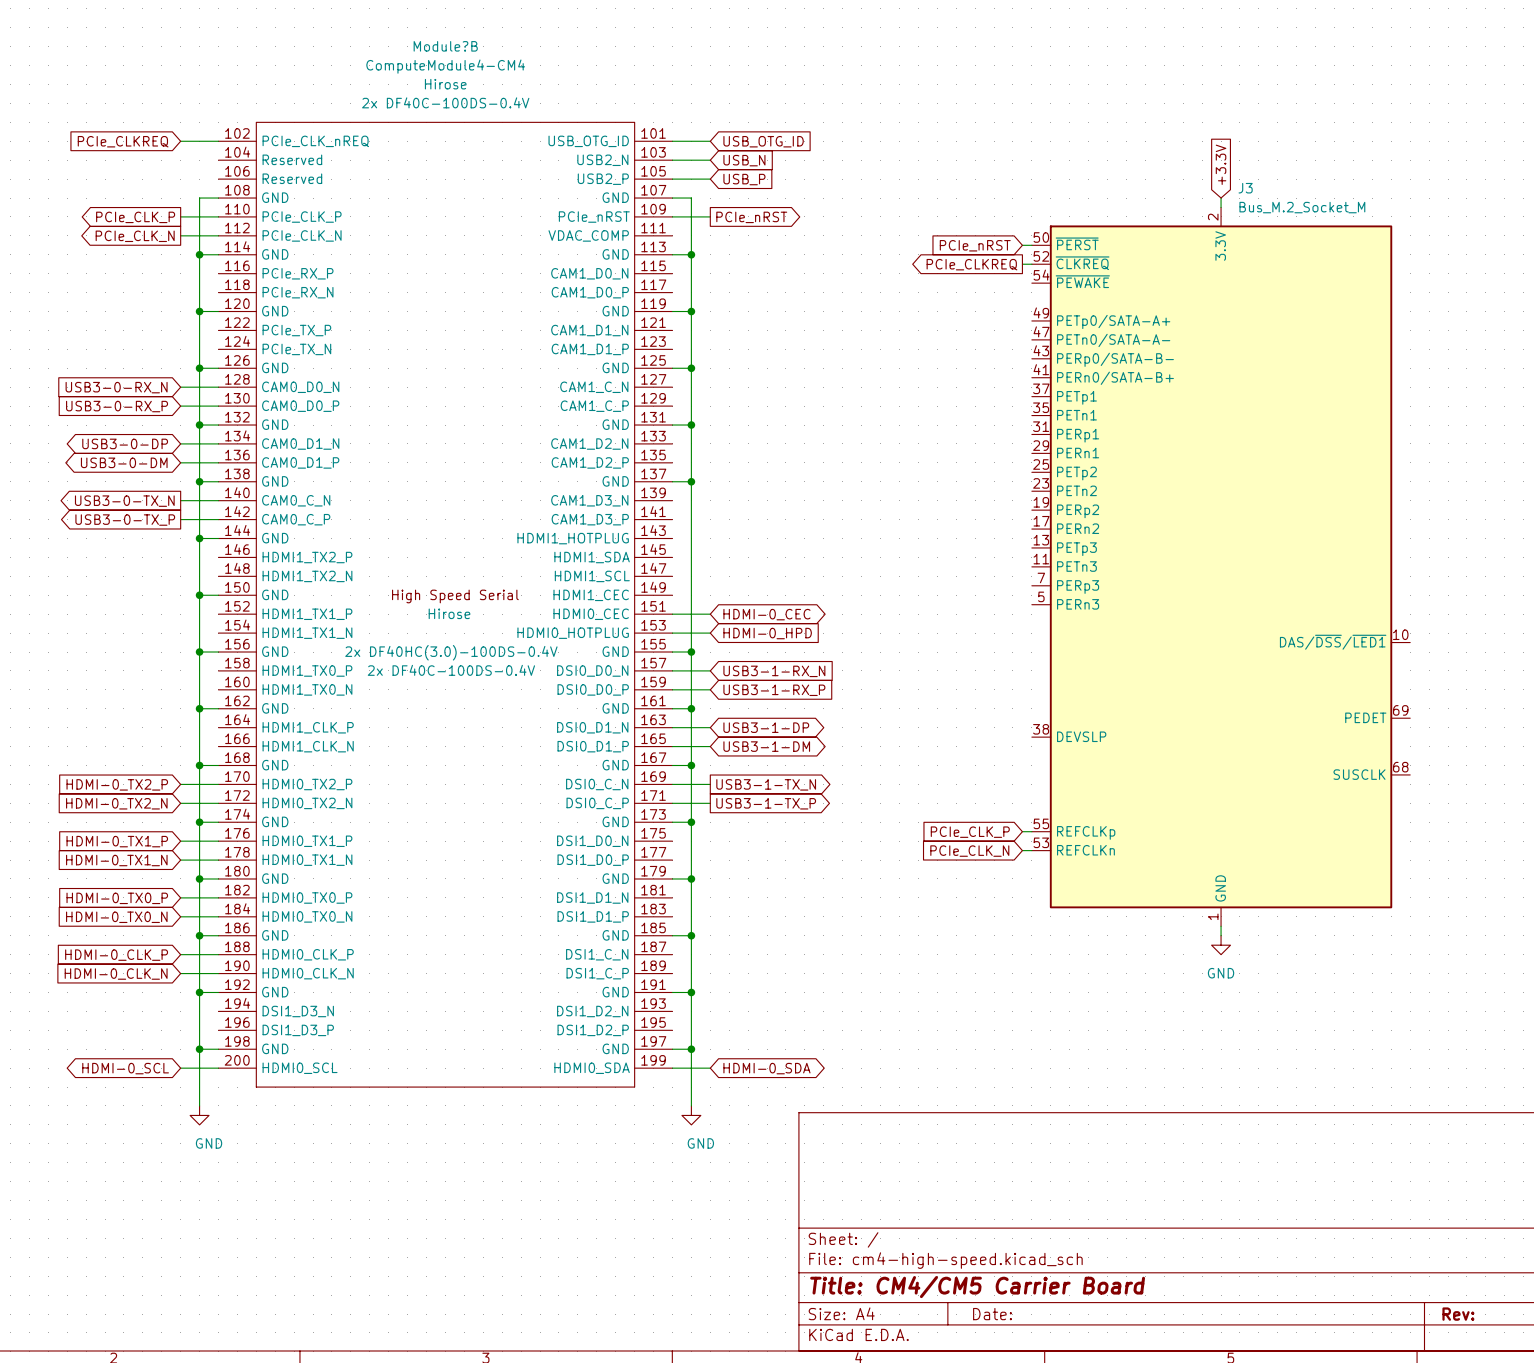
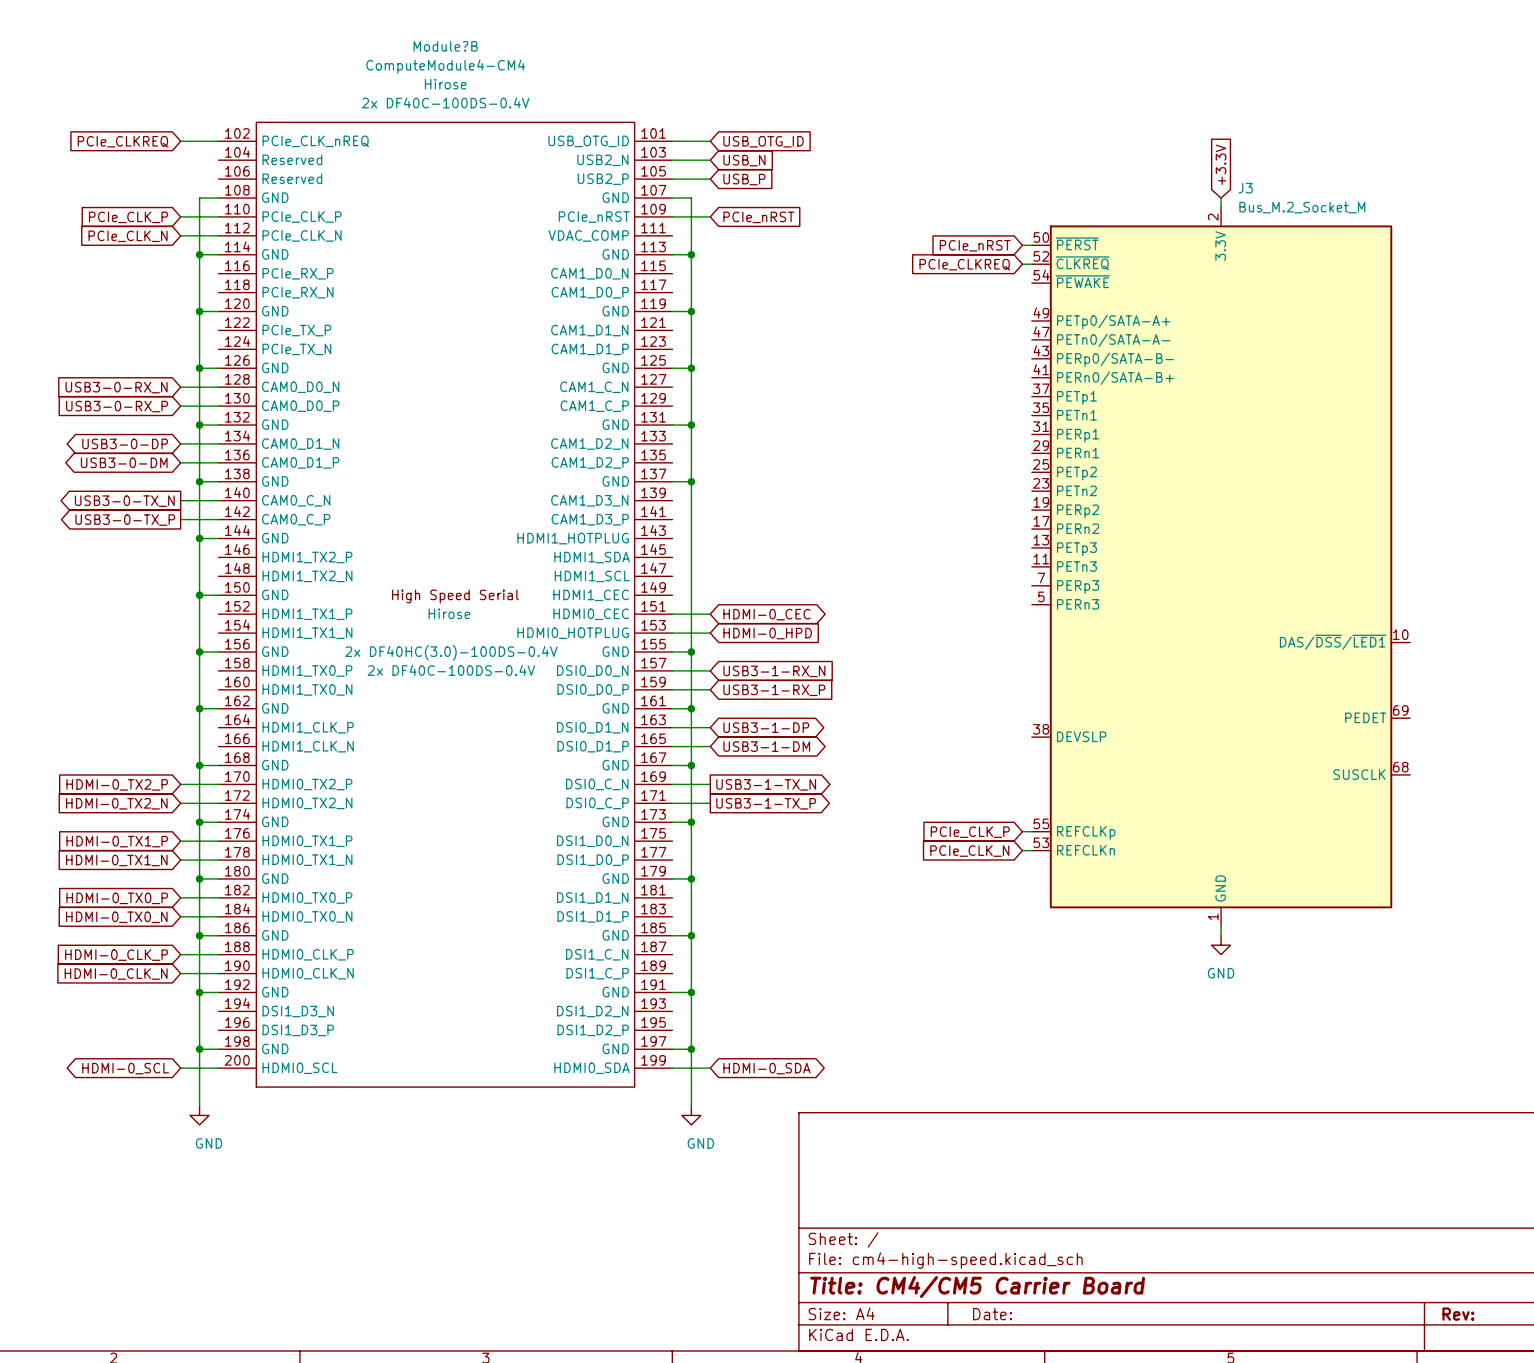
global label shape: output (135, 217) -> input (128, 217)
global label shape: output (751, 217) -> input (758, 217)
global label shape: output (135, 236) -> input (128, 236)
global label shape: output (971, 264) -> input (964, 264)

